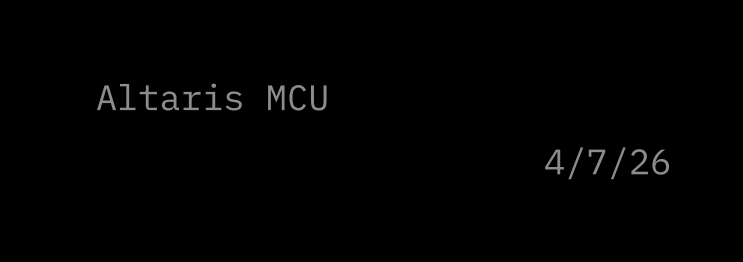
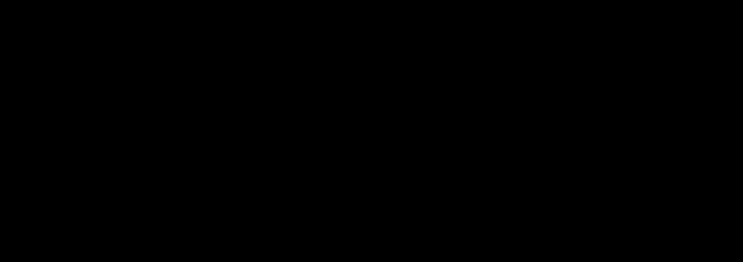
text: Altaris MCU (211, 97) -> none
text: 4/7/26 (607, 163) -> none

